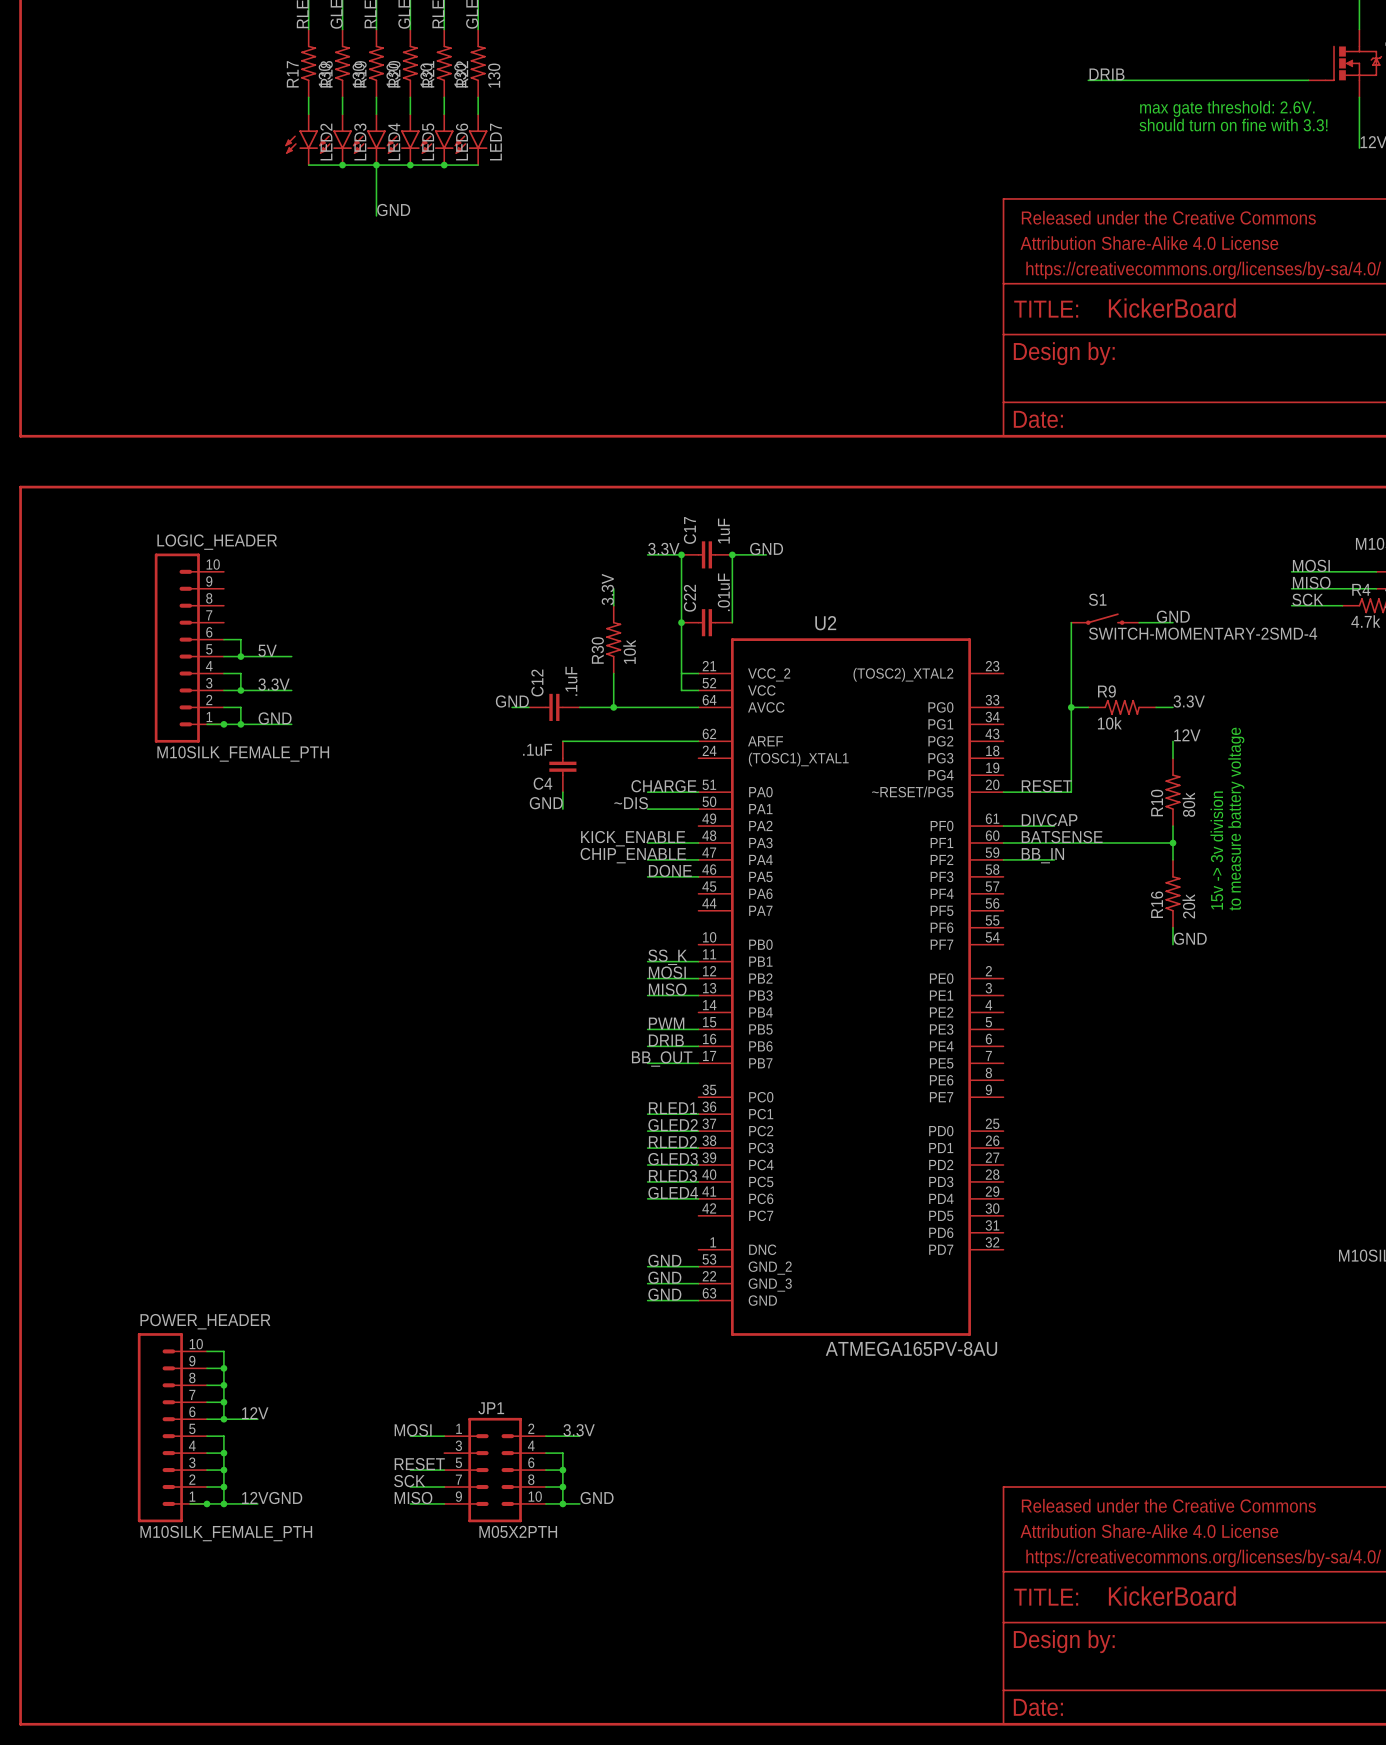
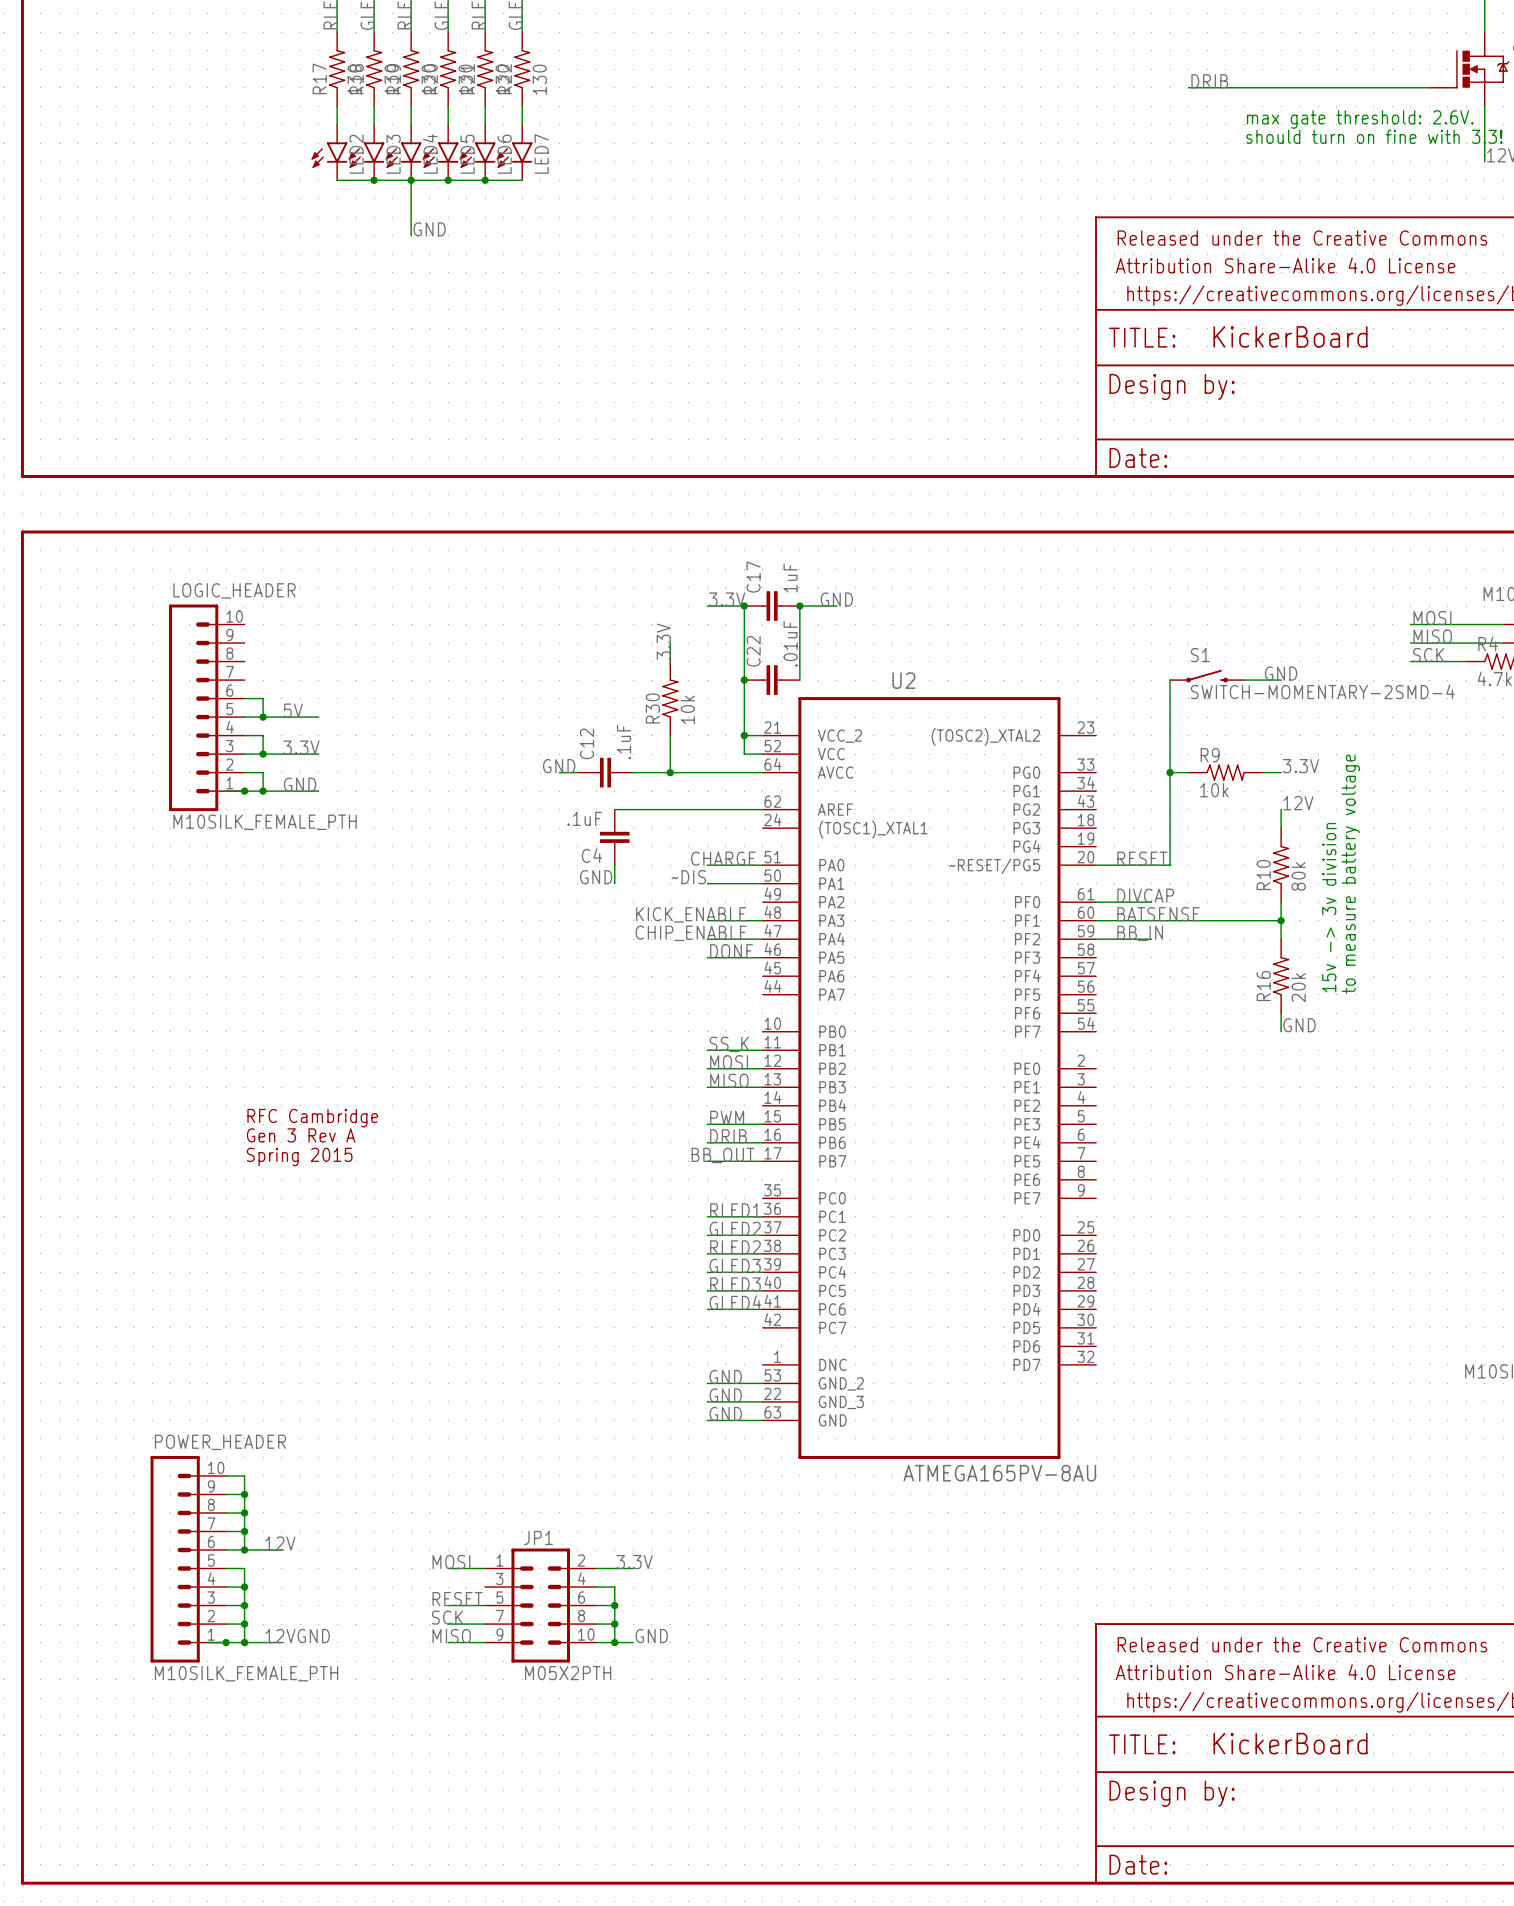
junction: none -> (744, 735)
part: none -> (312, 1137)

